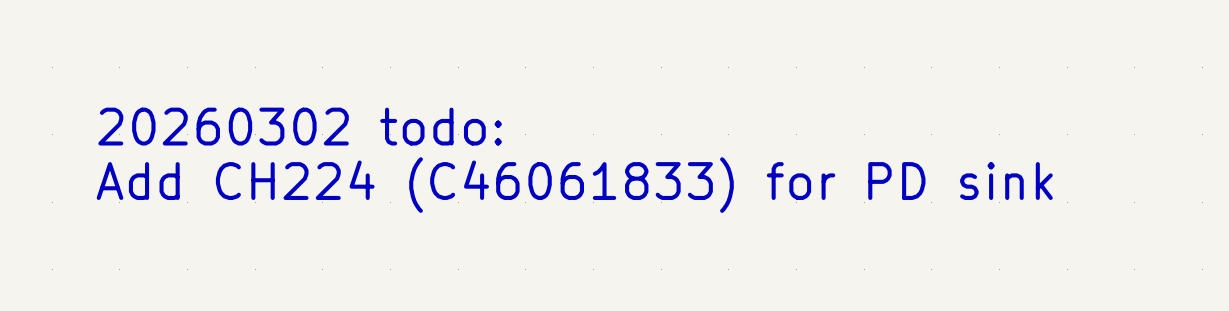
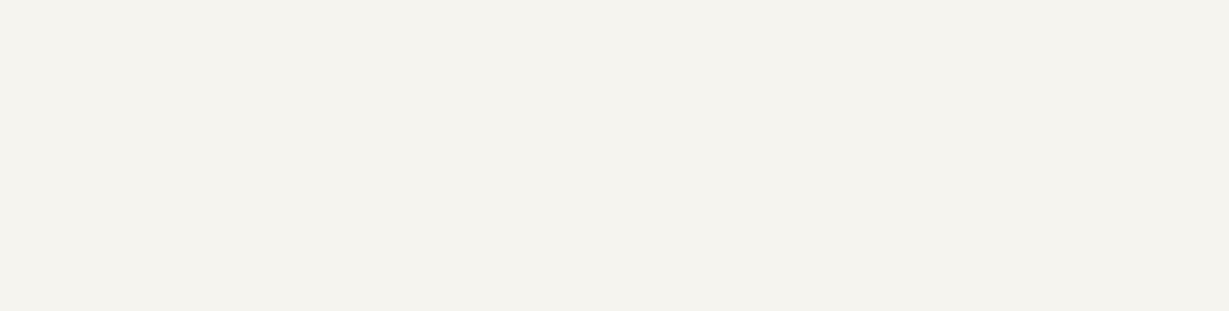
text: 20260302 todo: (300, 126) -> none
text: Add CH224 (C46061833) for PD sink (574, 185) -> none

